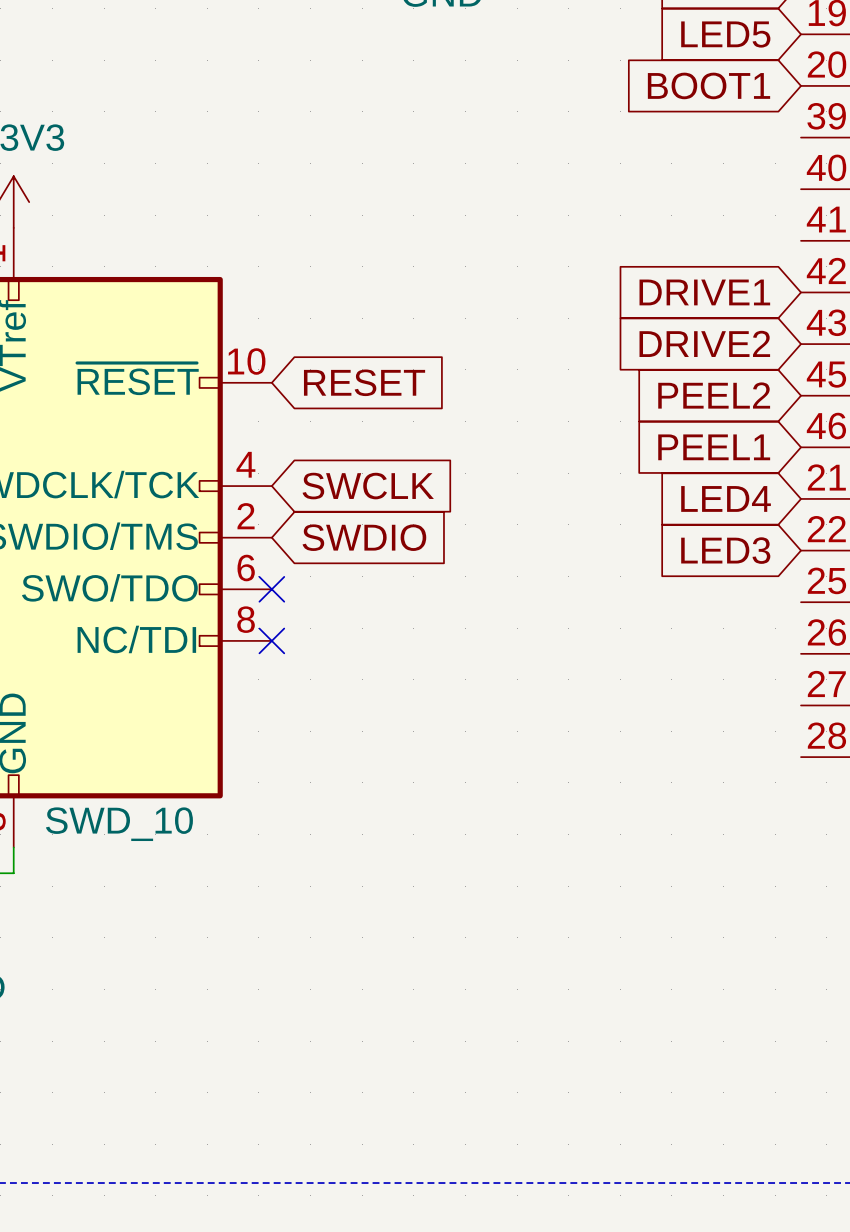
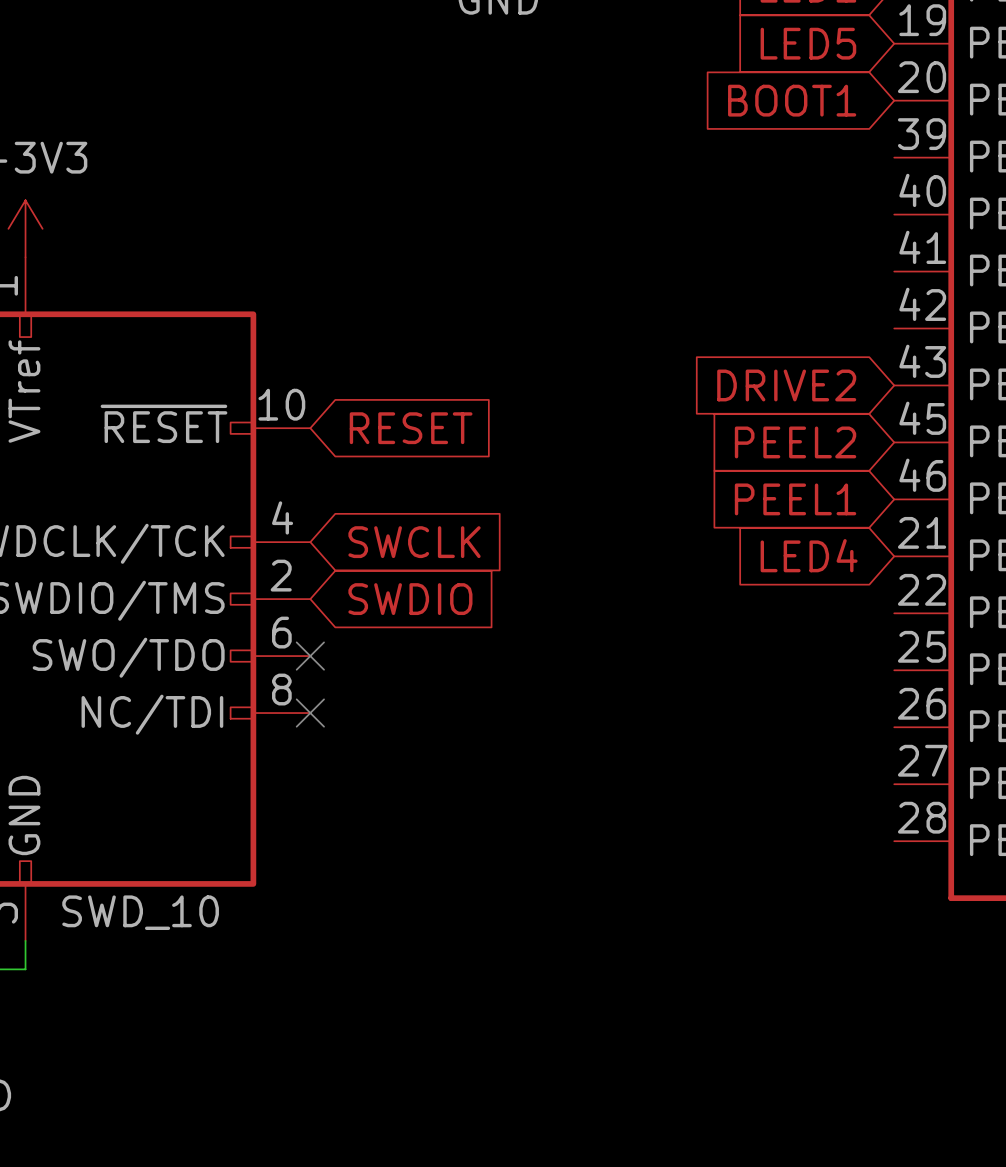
global label: DRIVE1 (704, 292) -> none
global label: LED3 (725, 550) -> none

